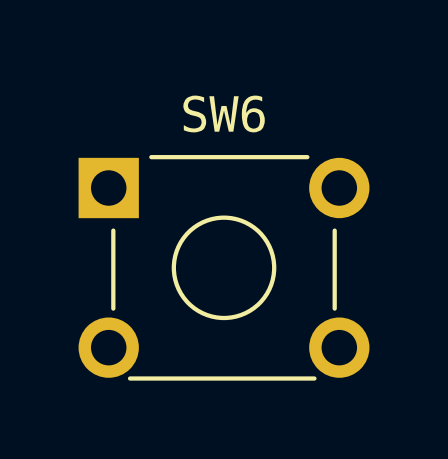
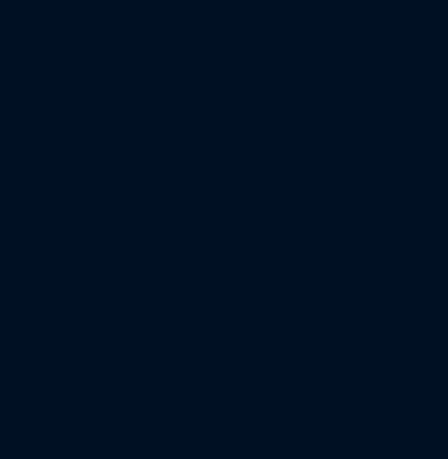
SW6: (224, 267) -> none

